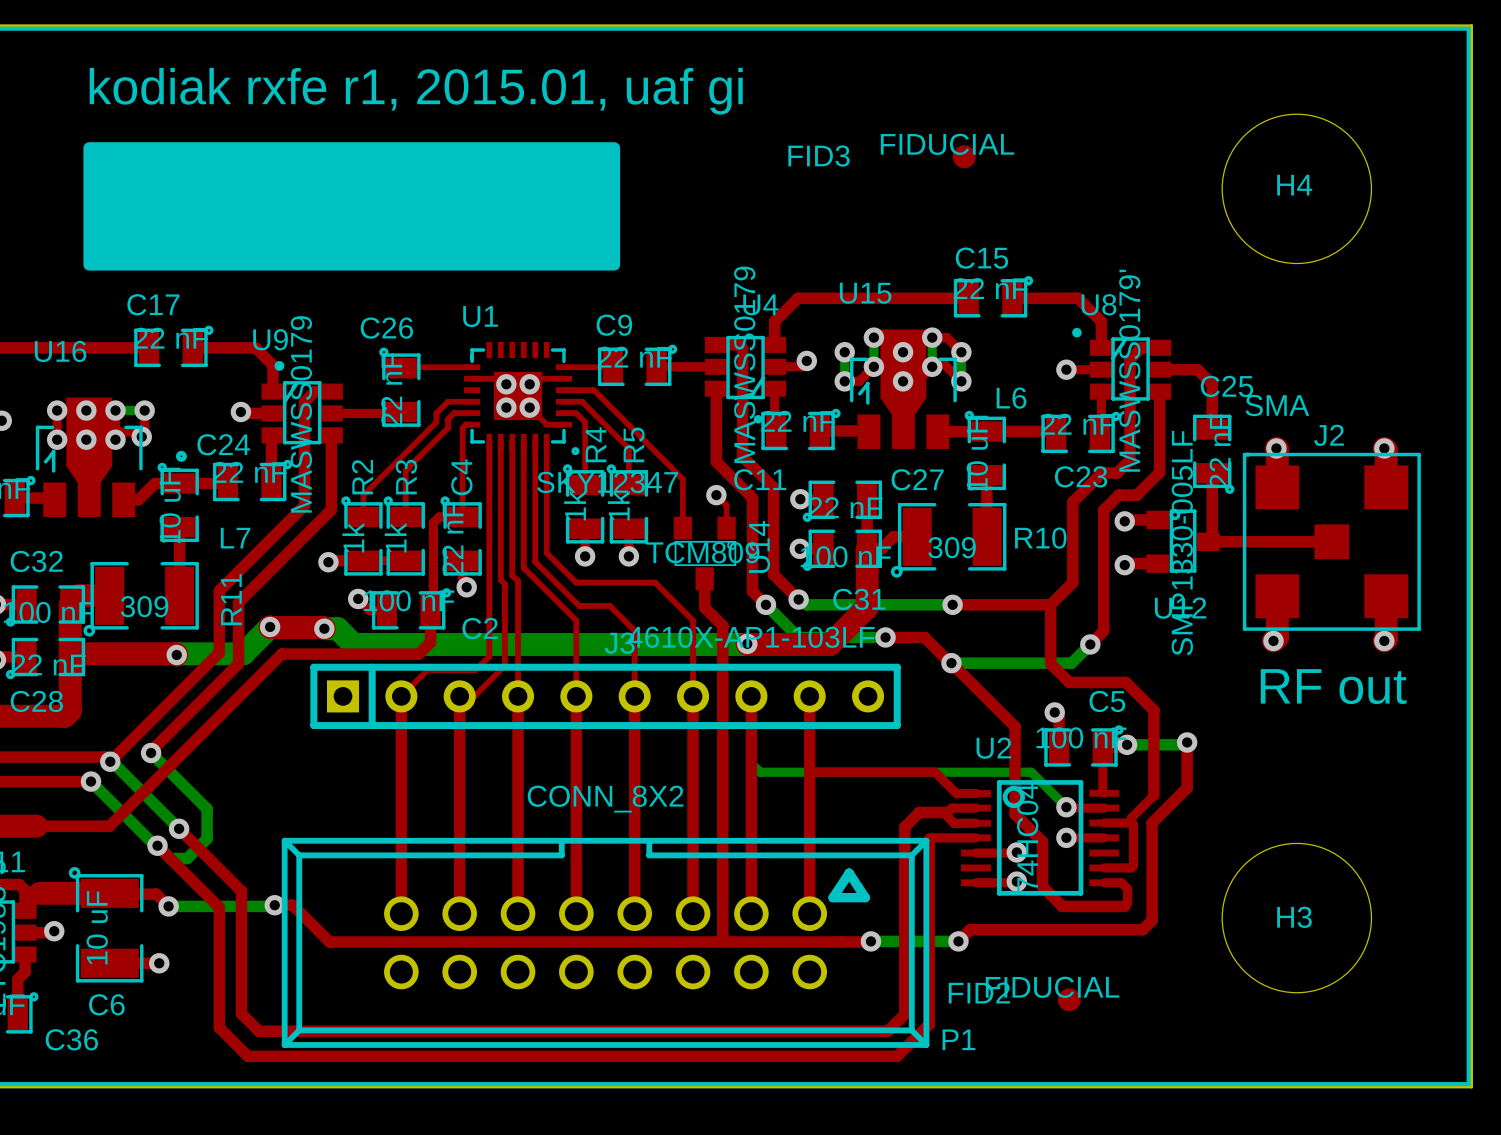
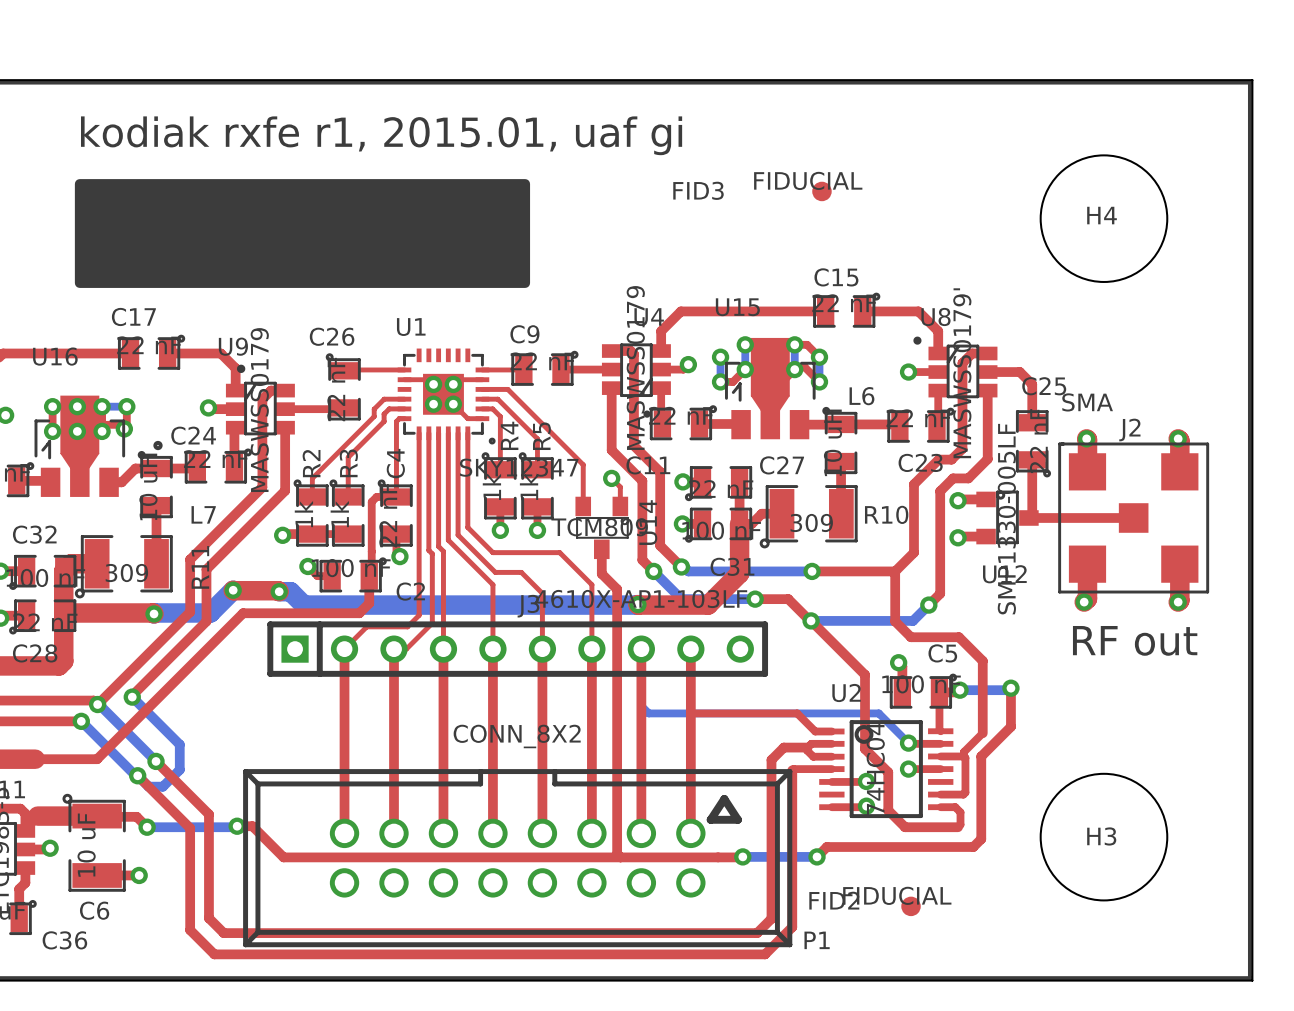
via: (903, 352) -> none
via: (903, 381) -> none

